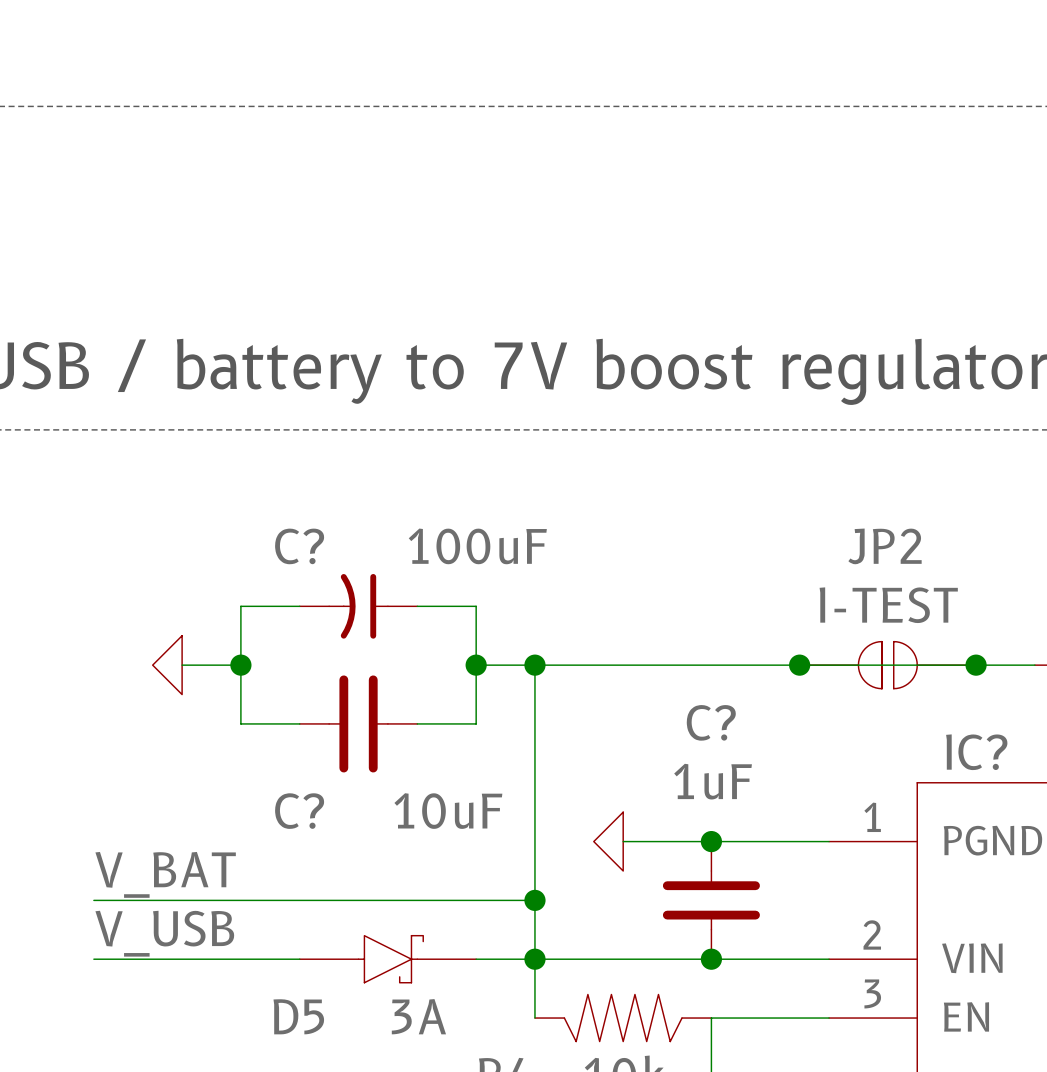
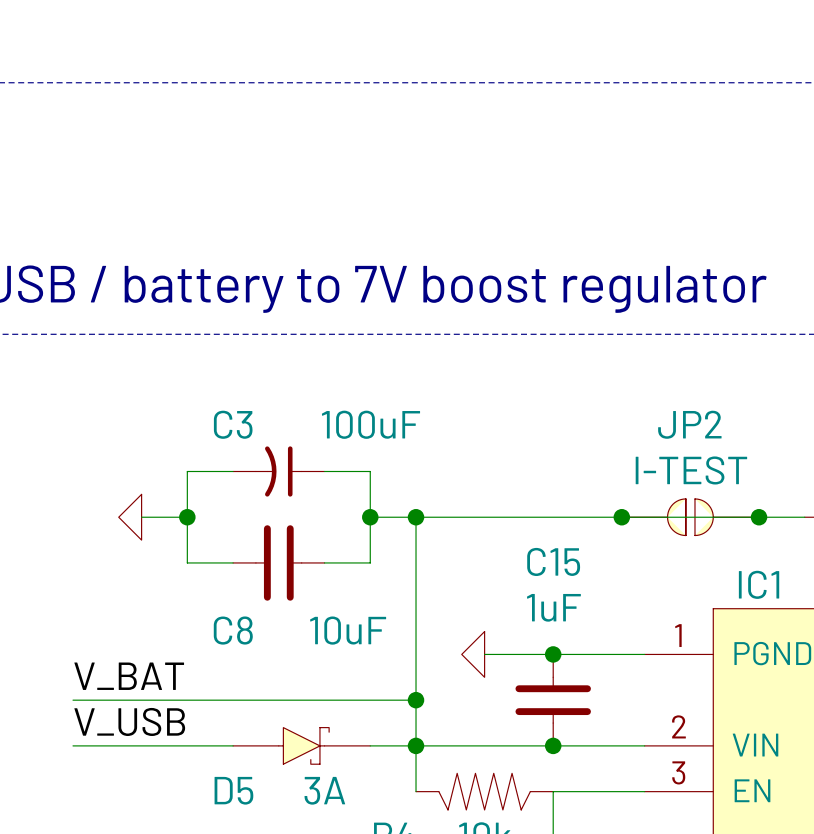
C? name: C? (299, 546) -> C3 (233, 424)
C? name: C? (711, 722) -> C15 (553, 561)
IC? name: IC? (976, 752) -> IC1 (759, 584)
C? name: C? (299, 811) -> C8 (233, 630)

